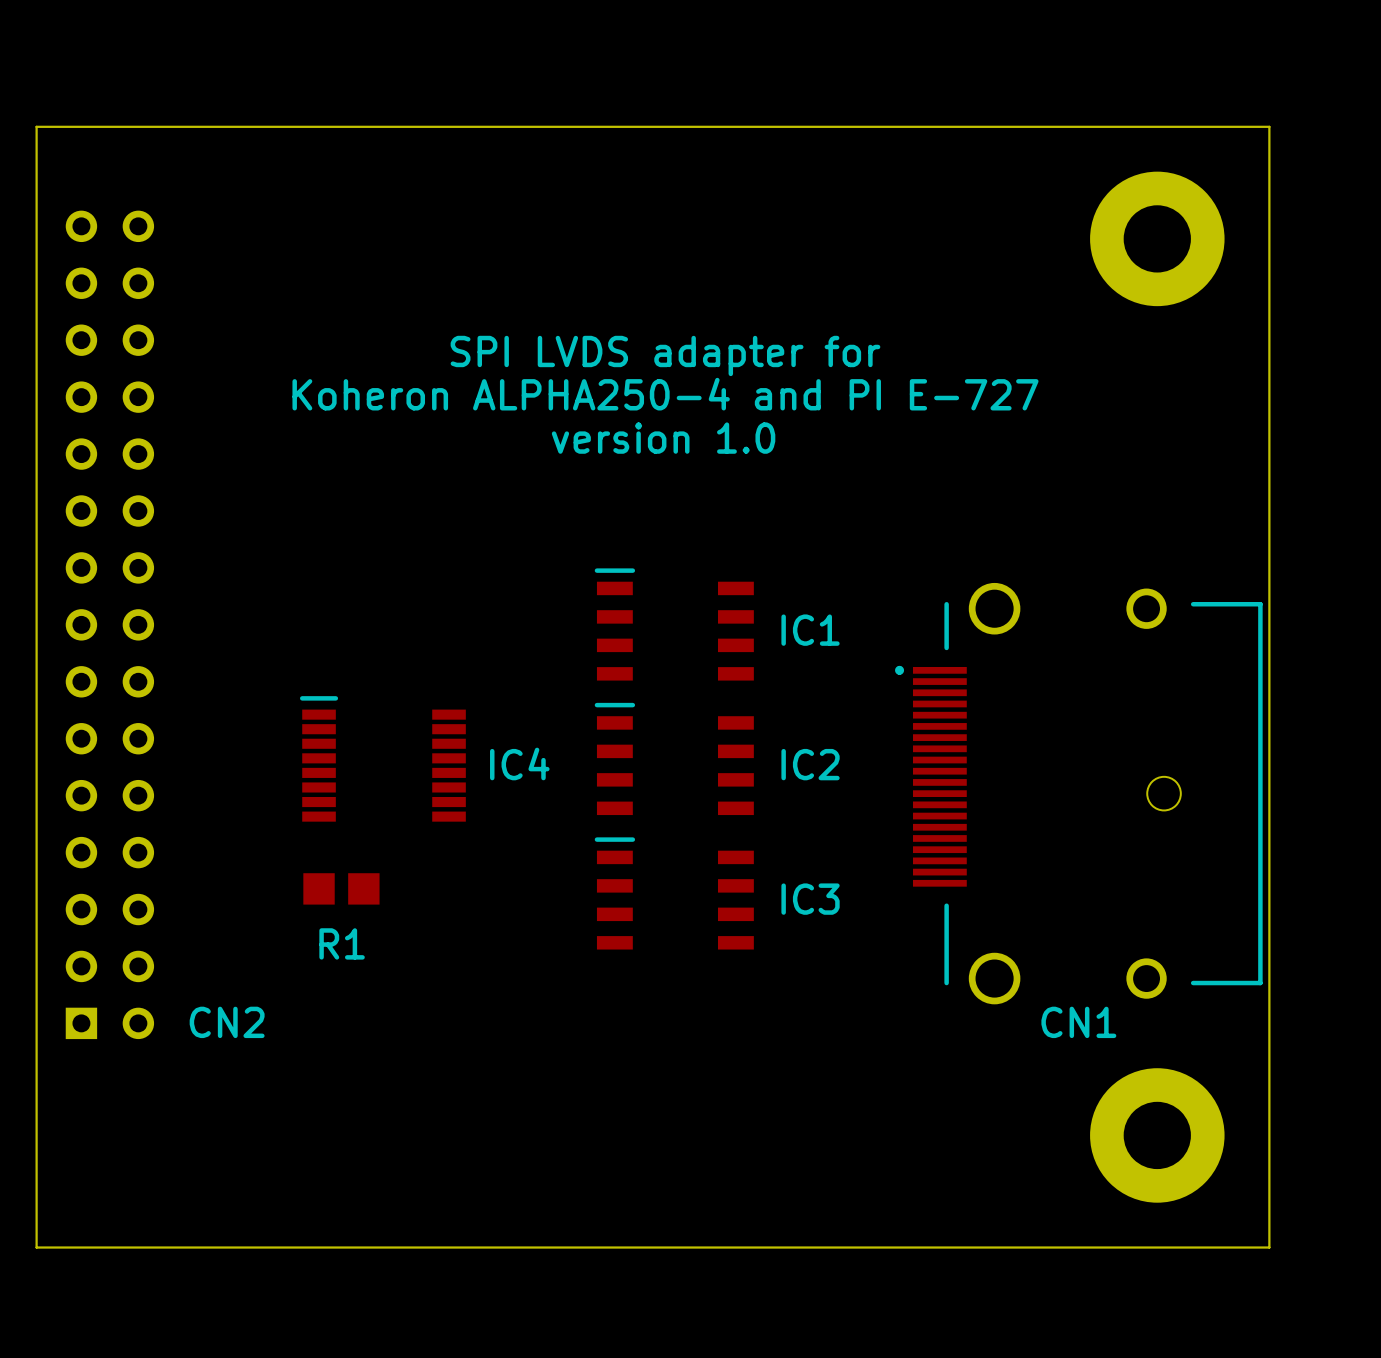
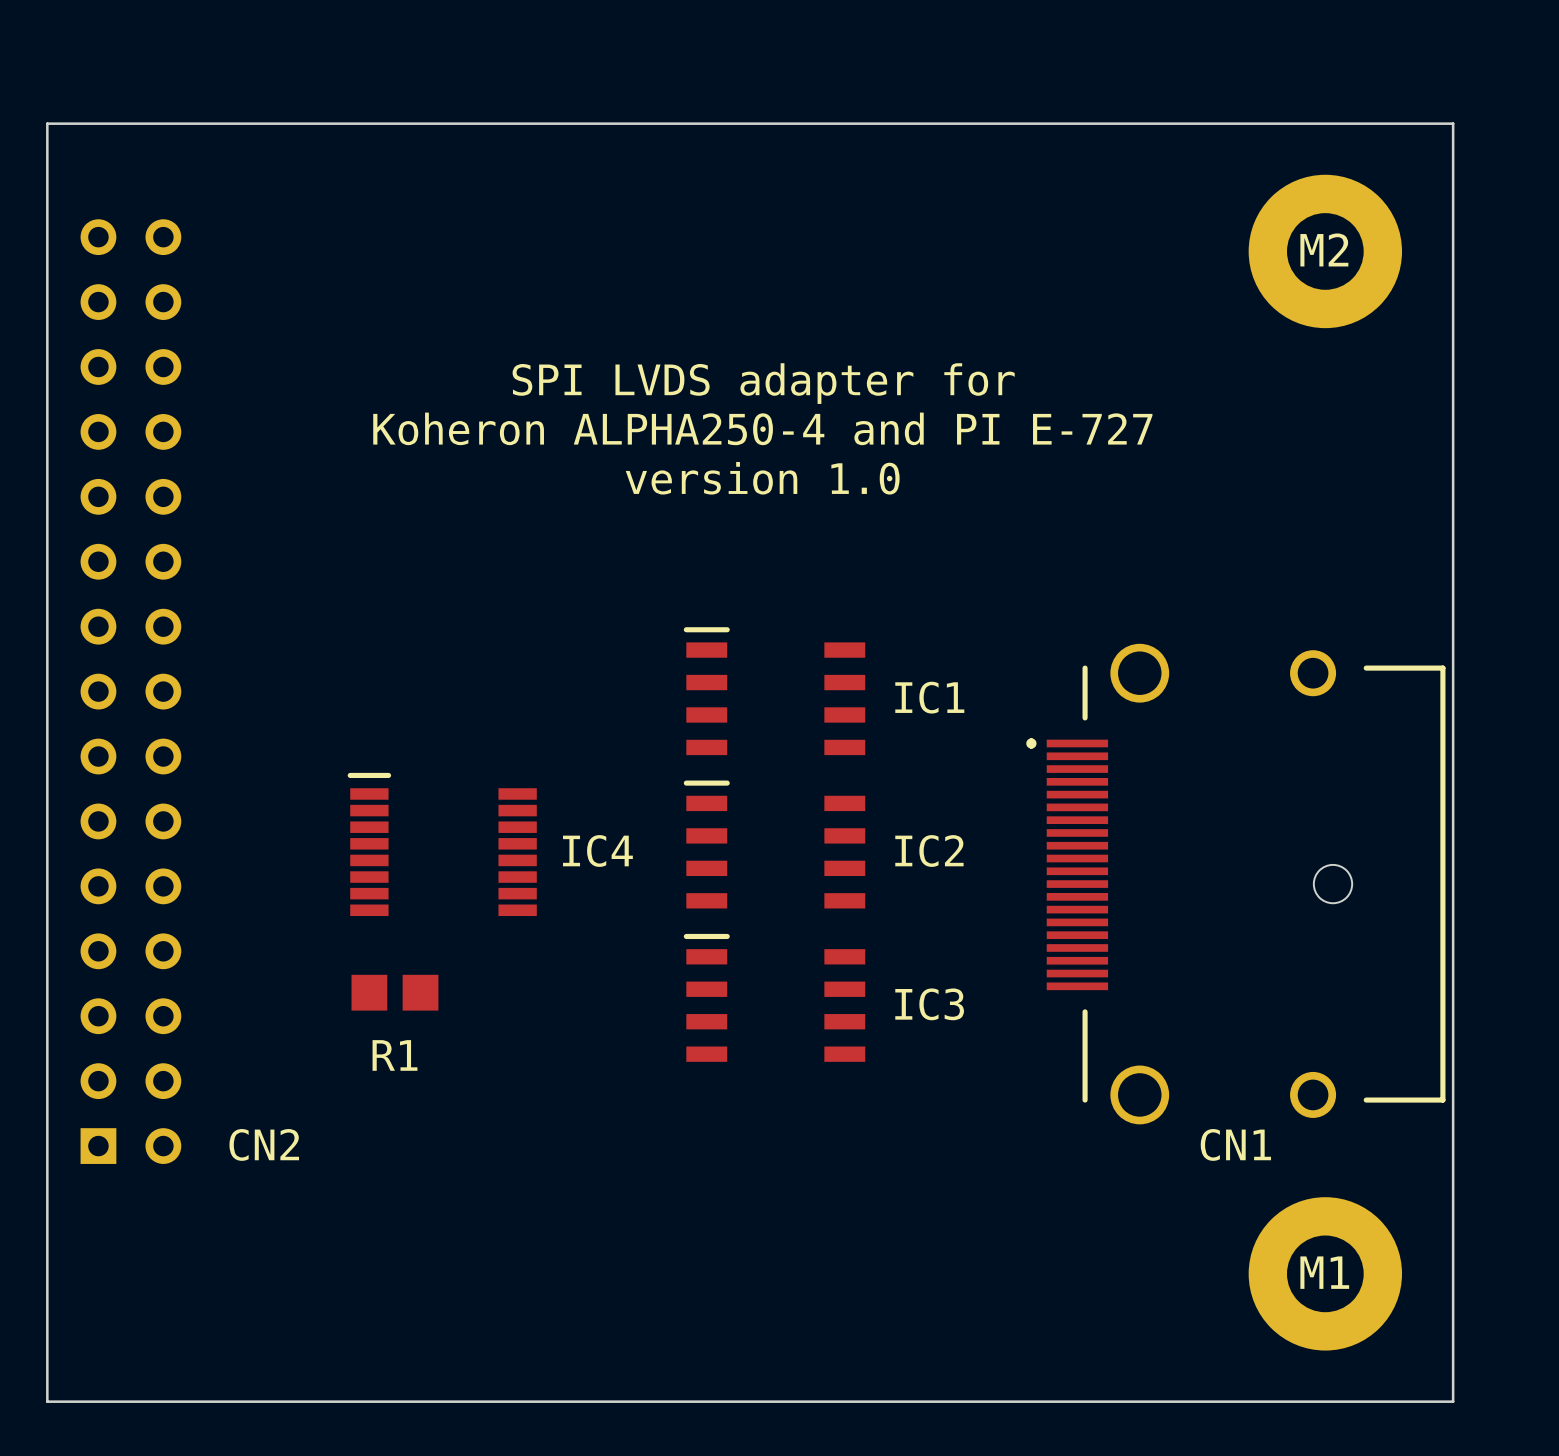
M2 name: none -> M2 (1324, 249)
M1 name: none -> M1 (1324, 1272)

